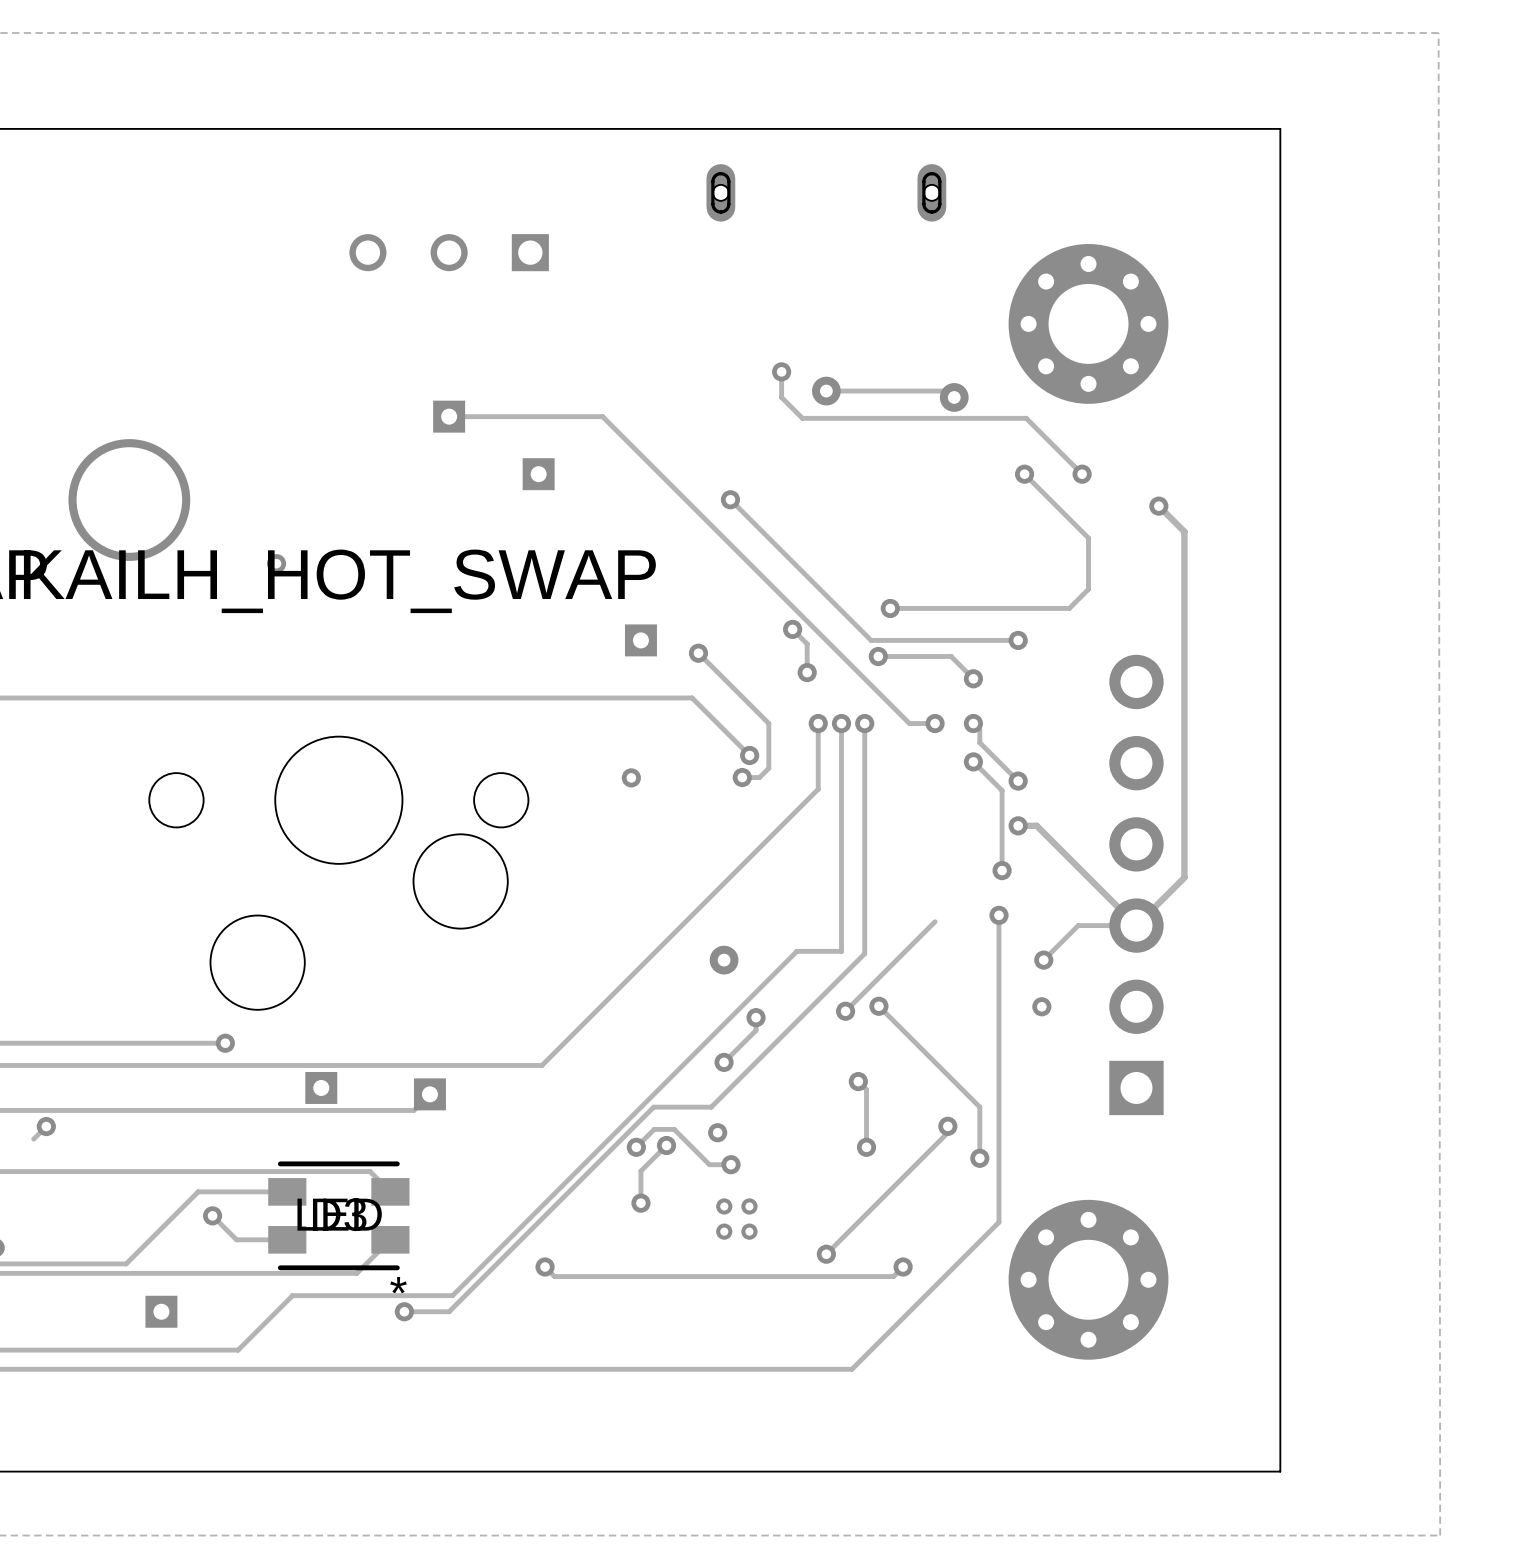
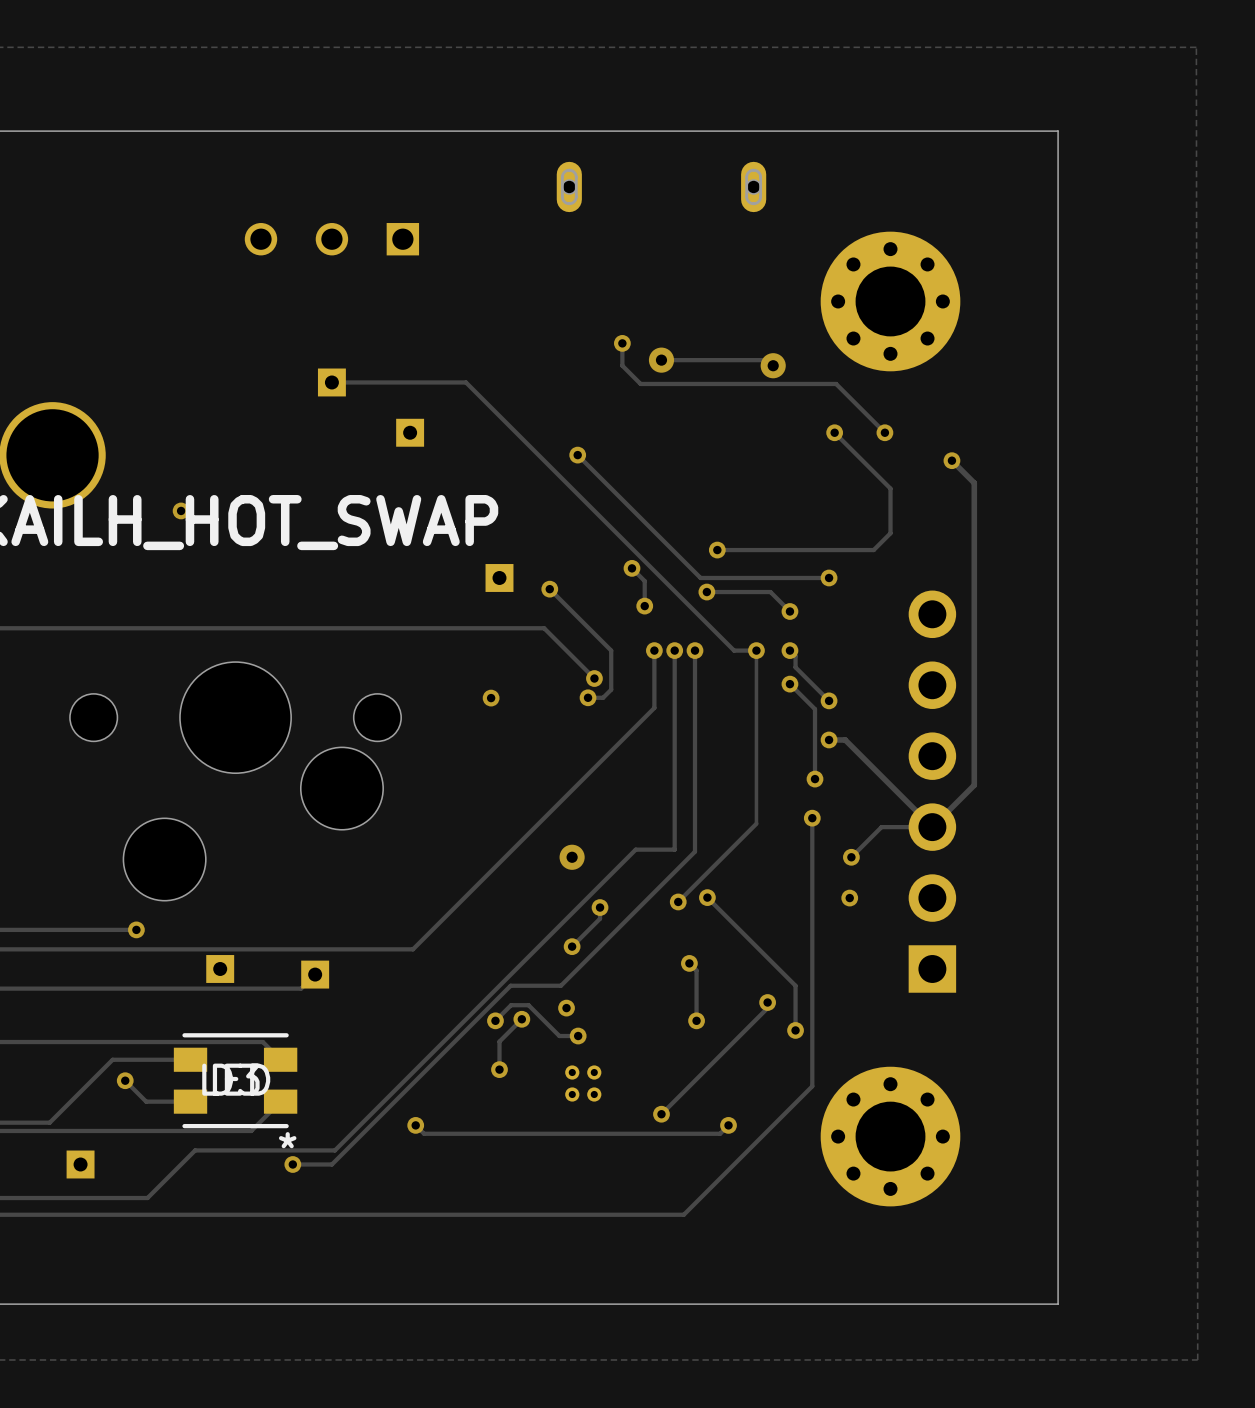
track: none -> (756, 650) (756, 823)

